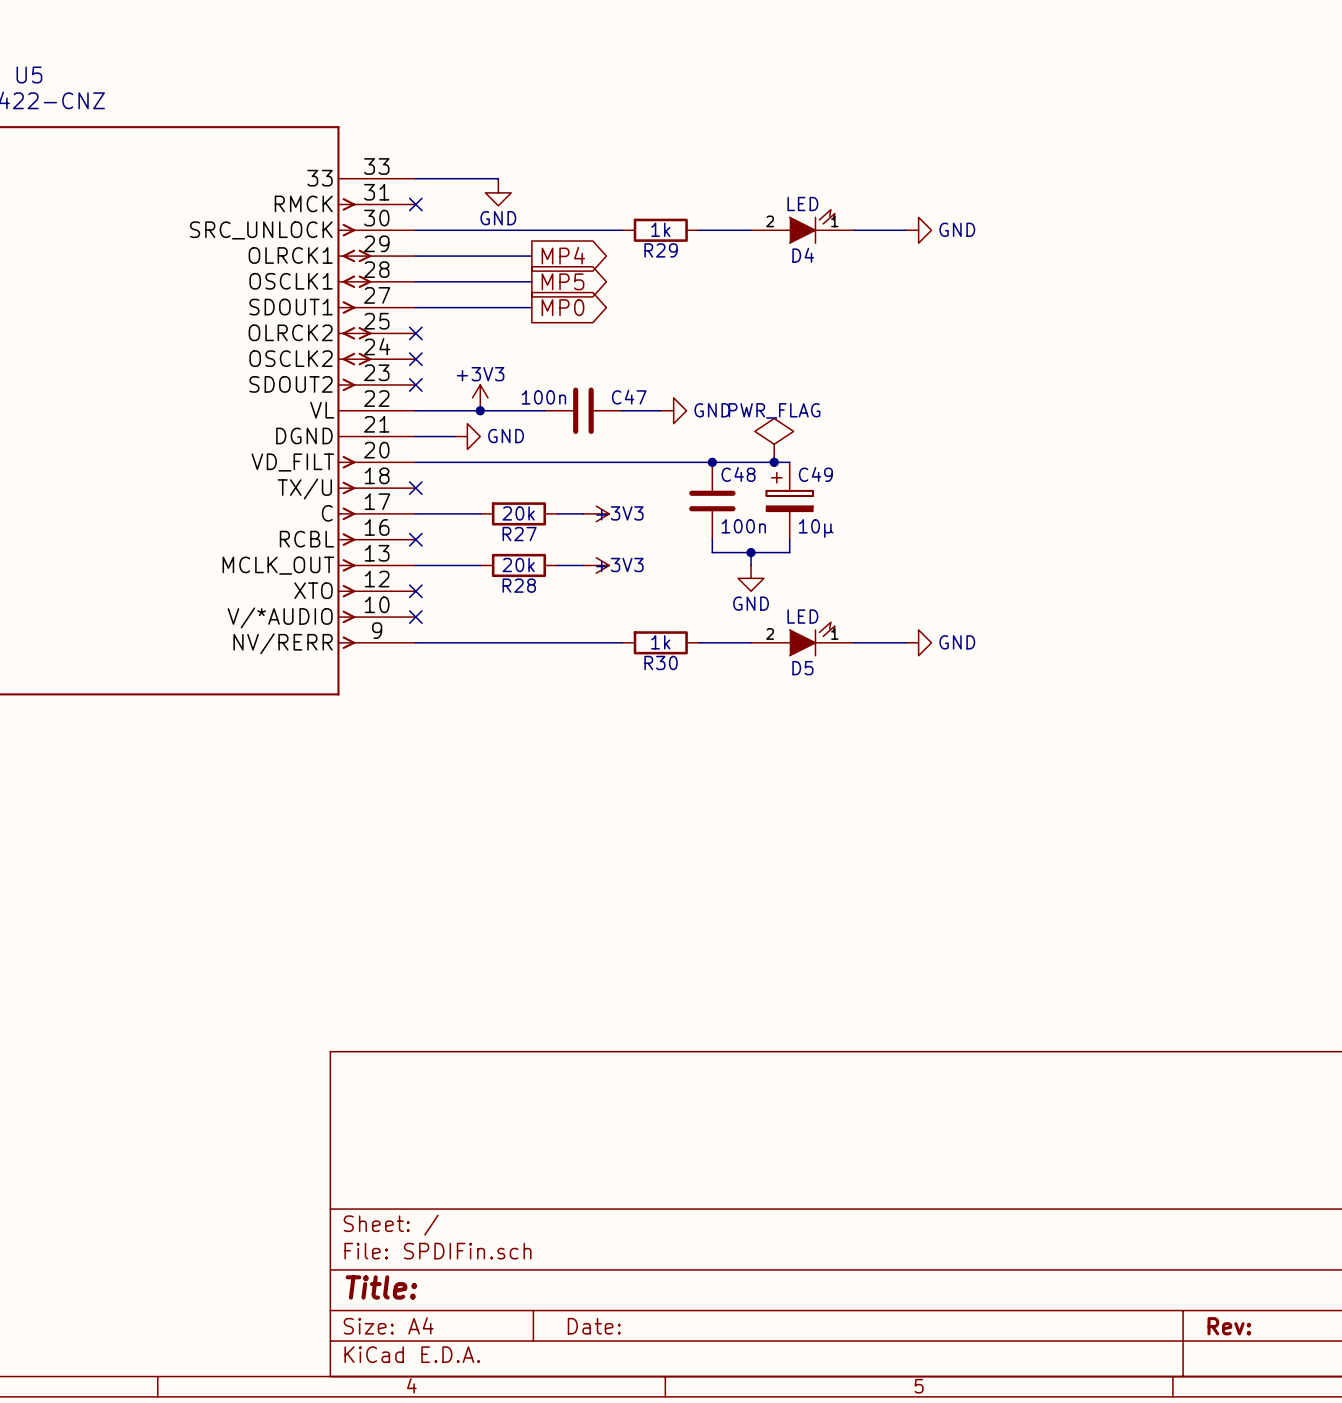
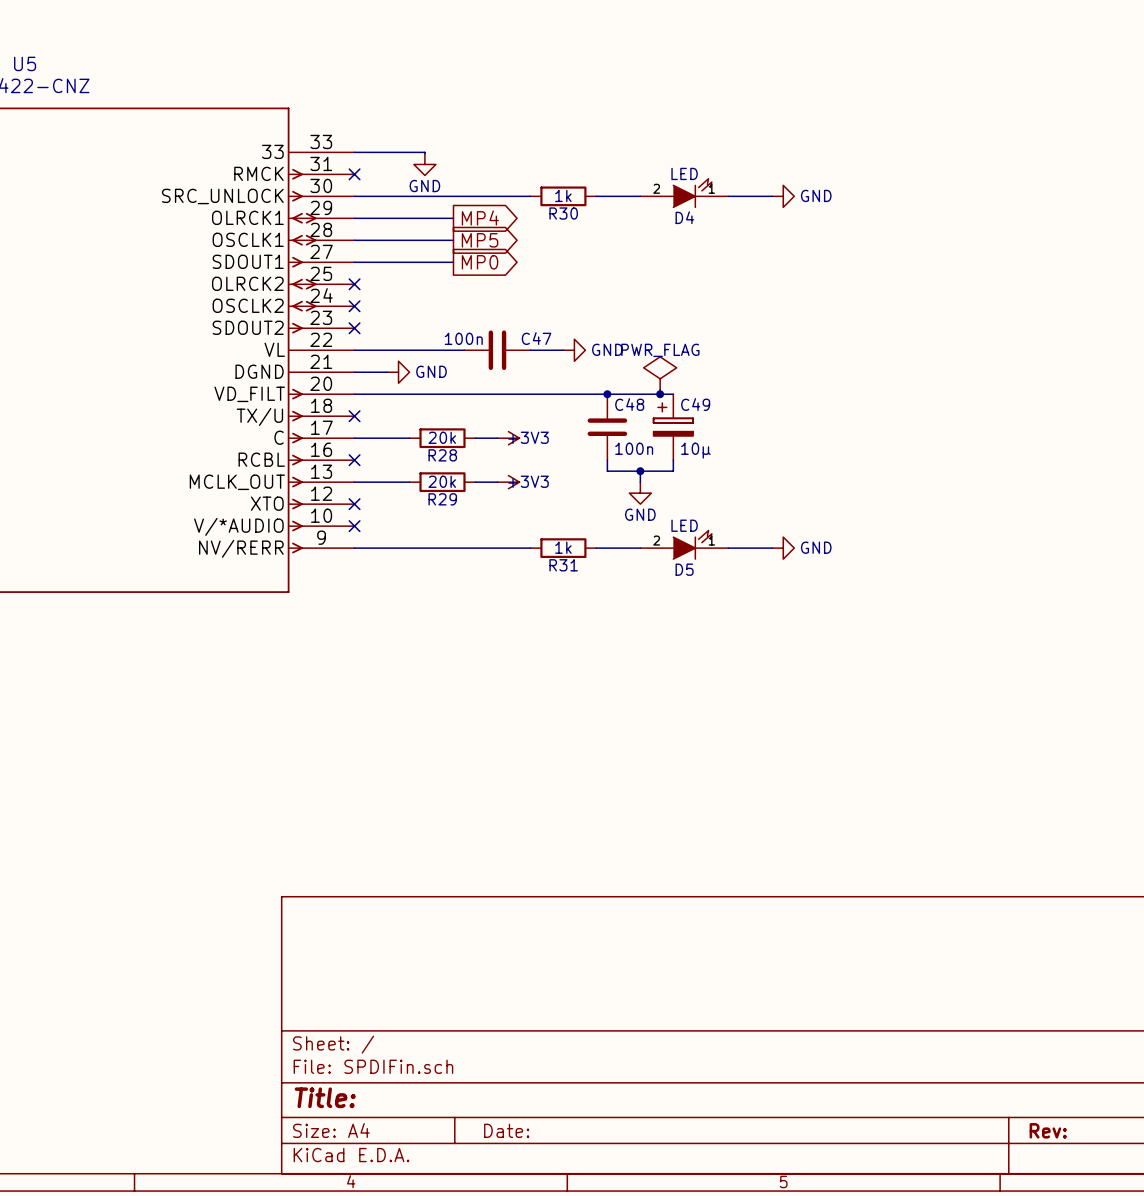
R29 name: R29 (661, 250) -> R30 (563, 213)
power symbol: +3V3 (480, 397) -> none
junction: (480, 410) -> none
R27 name: R27 (519, 534) -> R28 (442, 455)
R28 name: R28 (519, 585) -> R29 (442, 499)
R30 name: R30 (661, 662) -> R31 (563, 565)

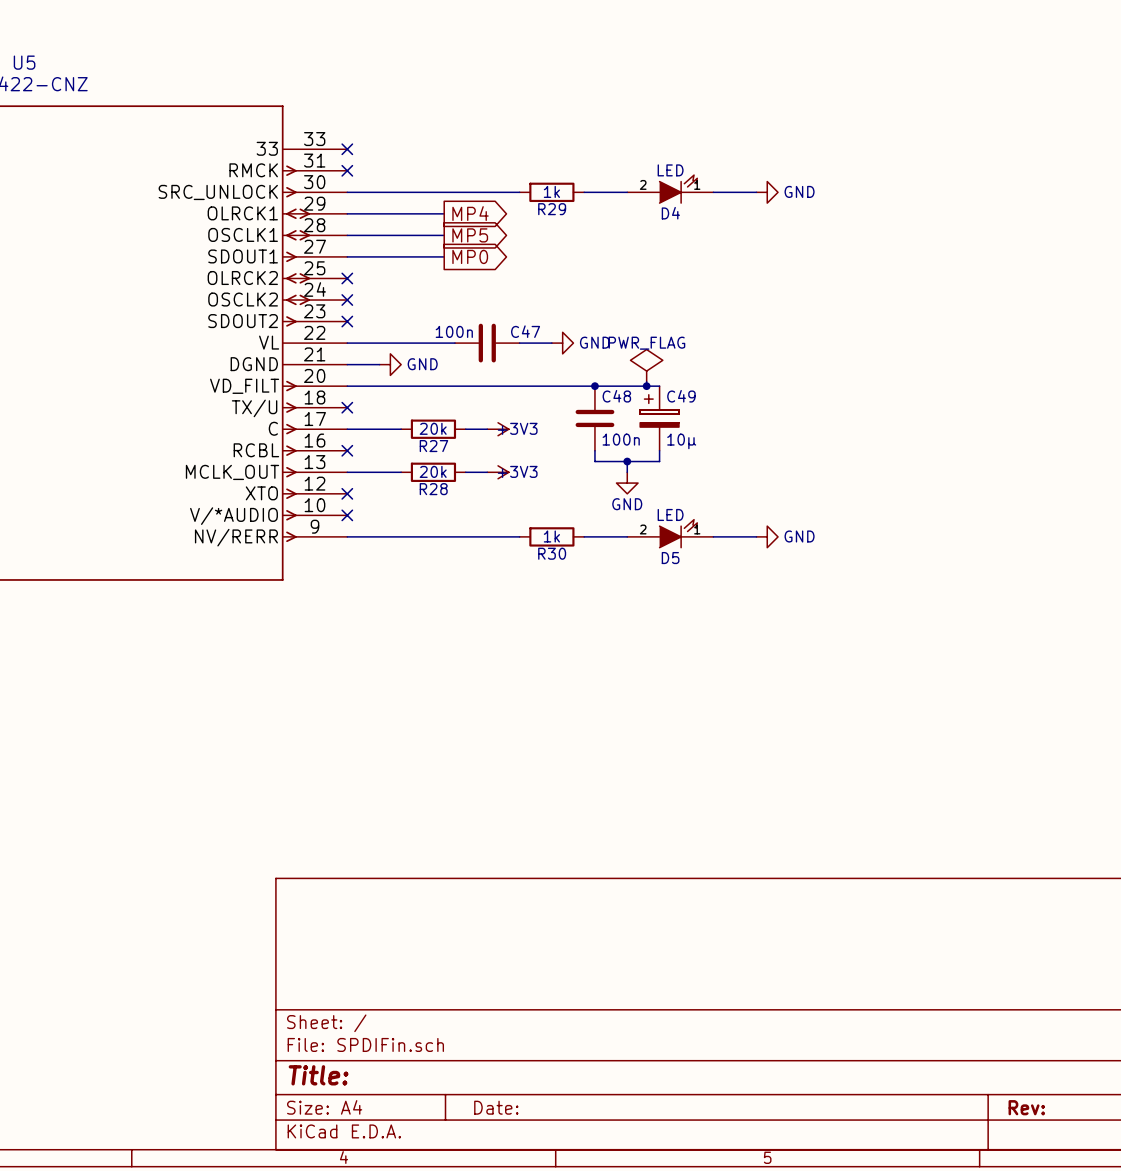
wire: (354, 152) (424, 153) -> none
no-connect mark: none -> (347, 149)
power symbol: GND (424, 164) -> none
R30 name: R30 (563, 213) -> R29 (552, 209)
R28 name: R28 (442, 455) -> R27 (433, 446)
R29 name: R29 (442, 499) -> R28 (433, 489)
R31 name: R31 (563, 565) -> R30 (552, 553)

